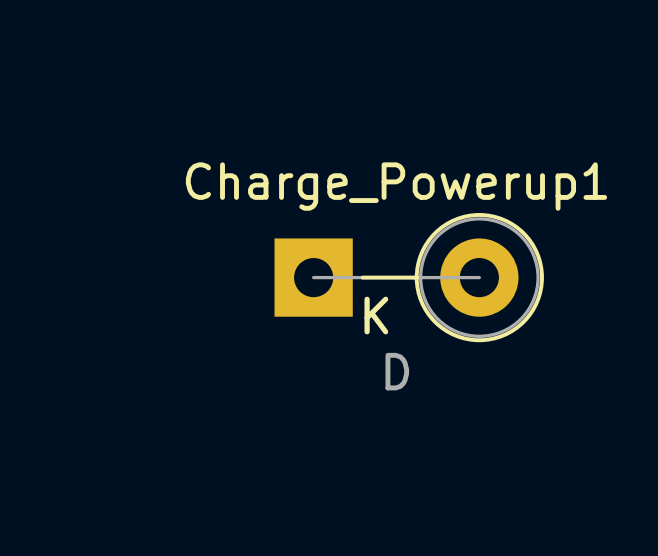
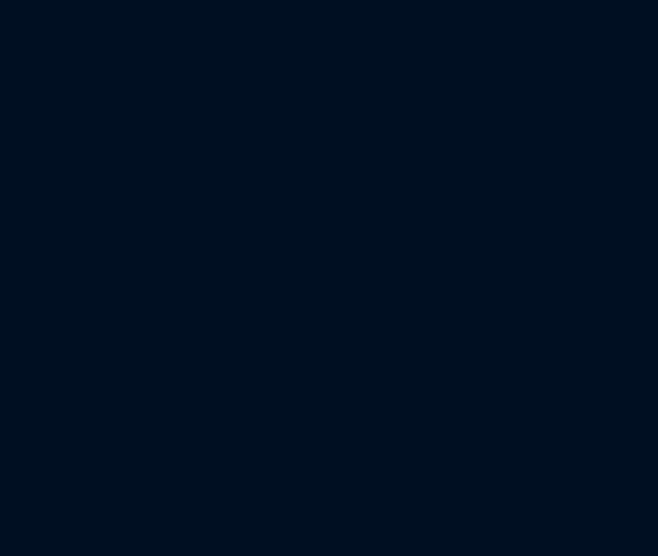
Charge_Powerup1: D (409, 277) -> none

